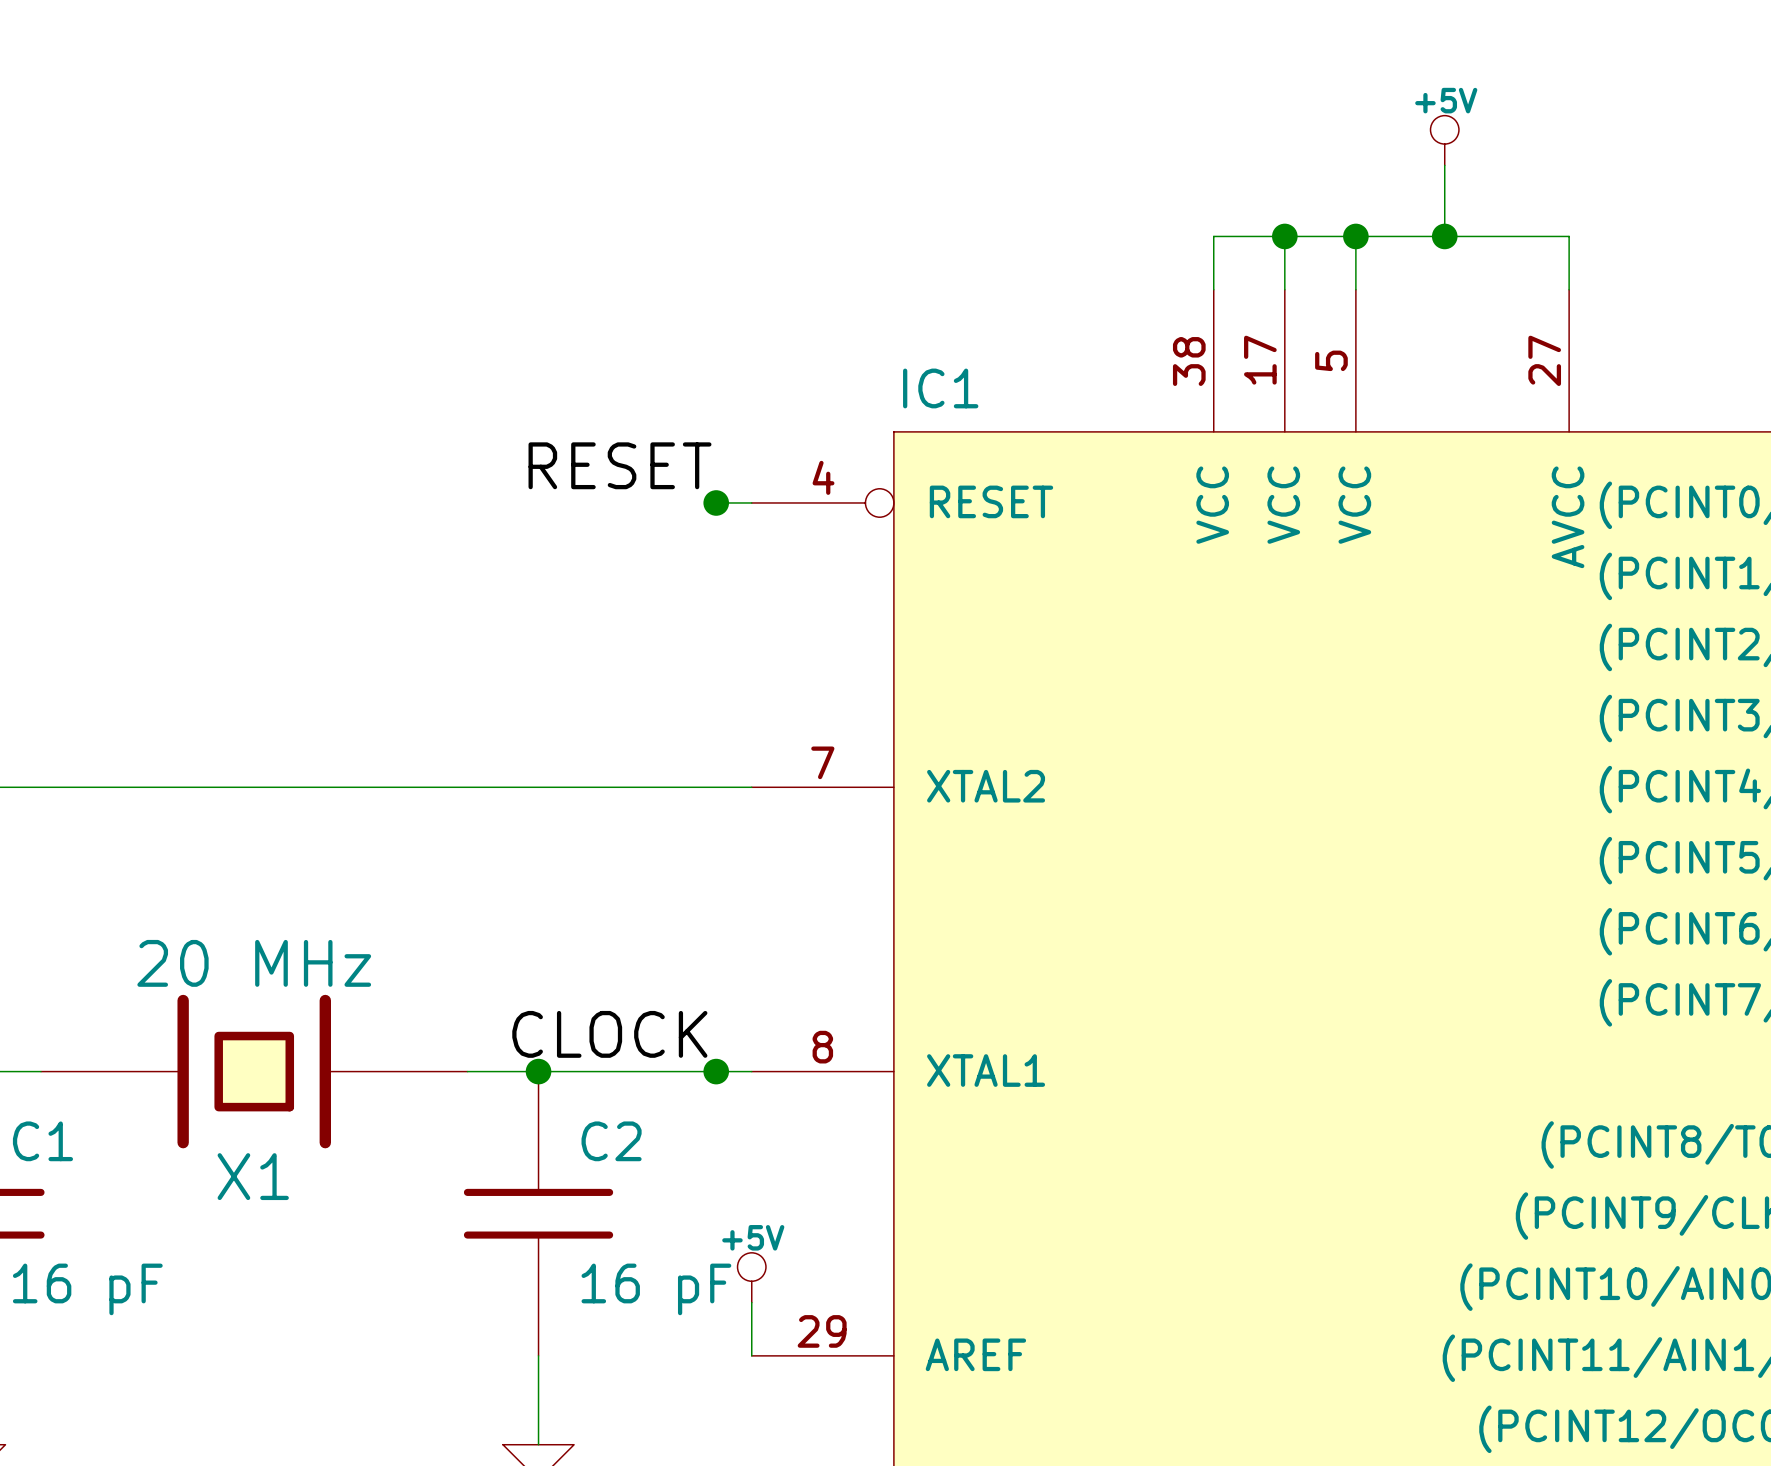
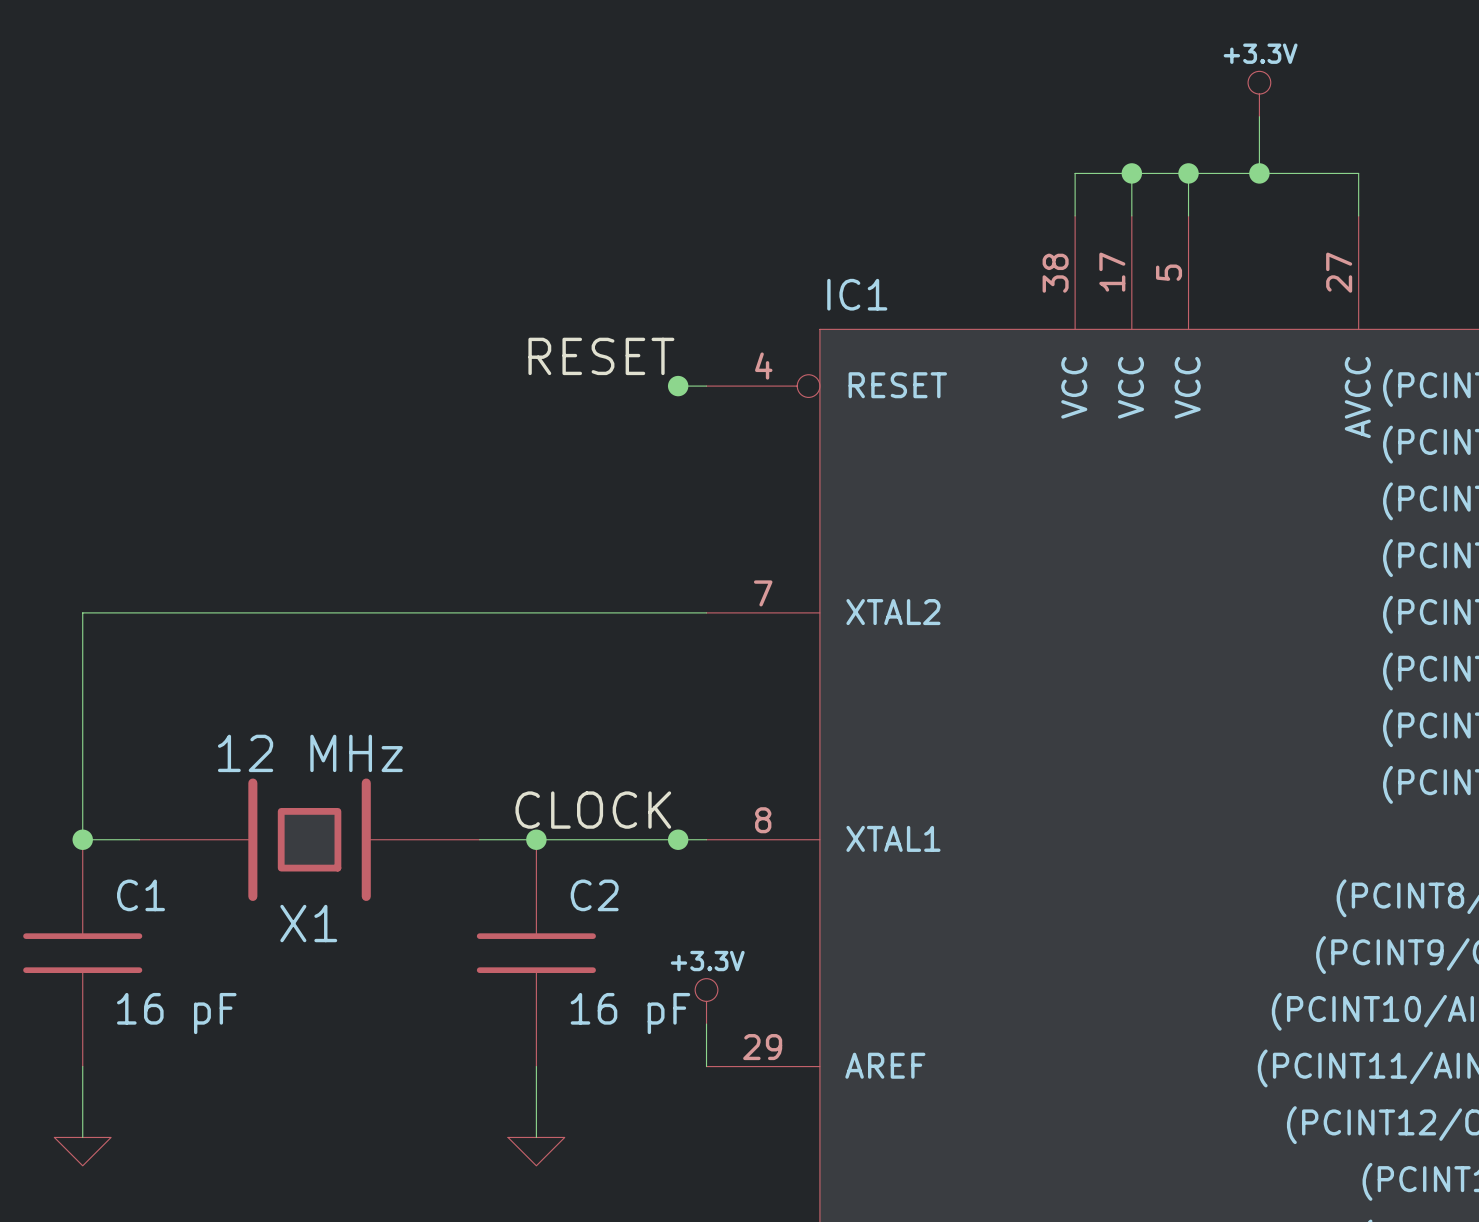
power symbol: +5V (1444, 140) -> +3.3V (1259, 94)
X1 value: 20 MHz (254, 963) -> 12 MHz (310, 753)
power symbol: +5V (751, 1277) -> +3.3V (706, 1001)

